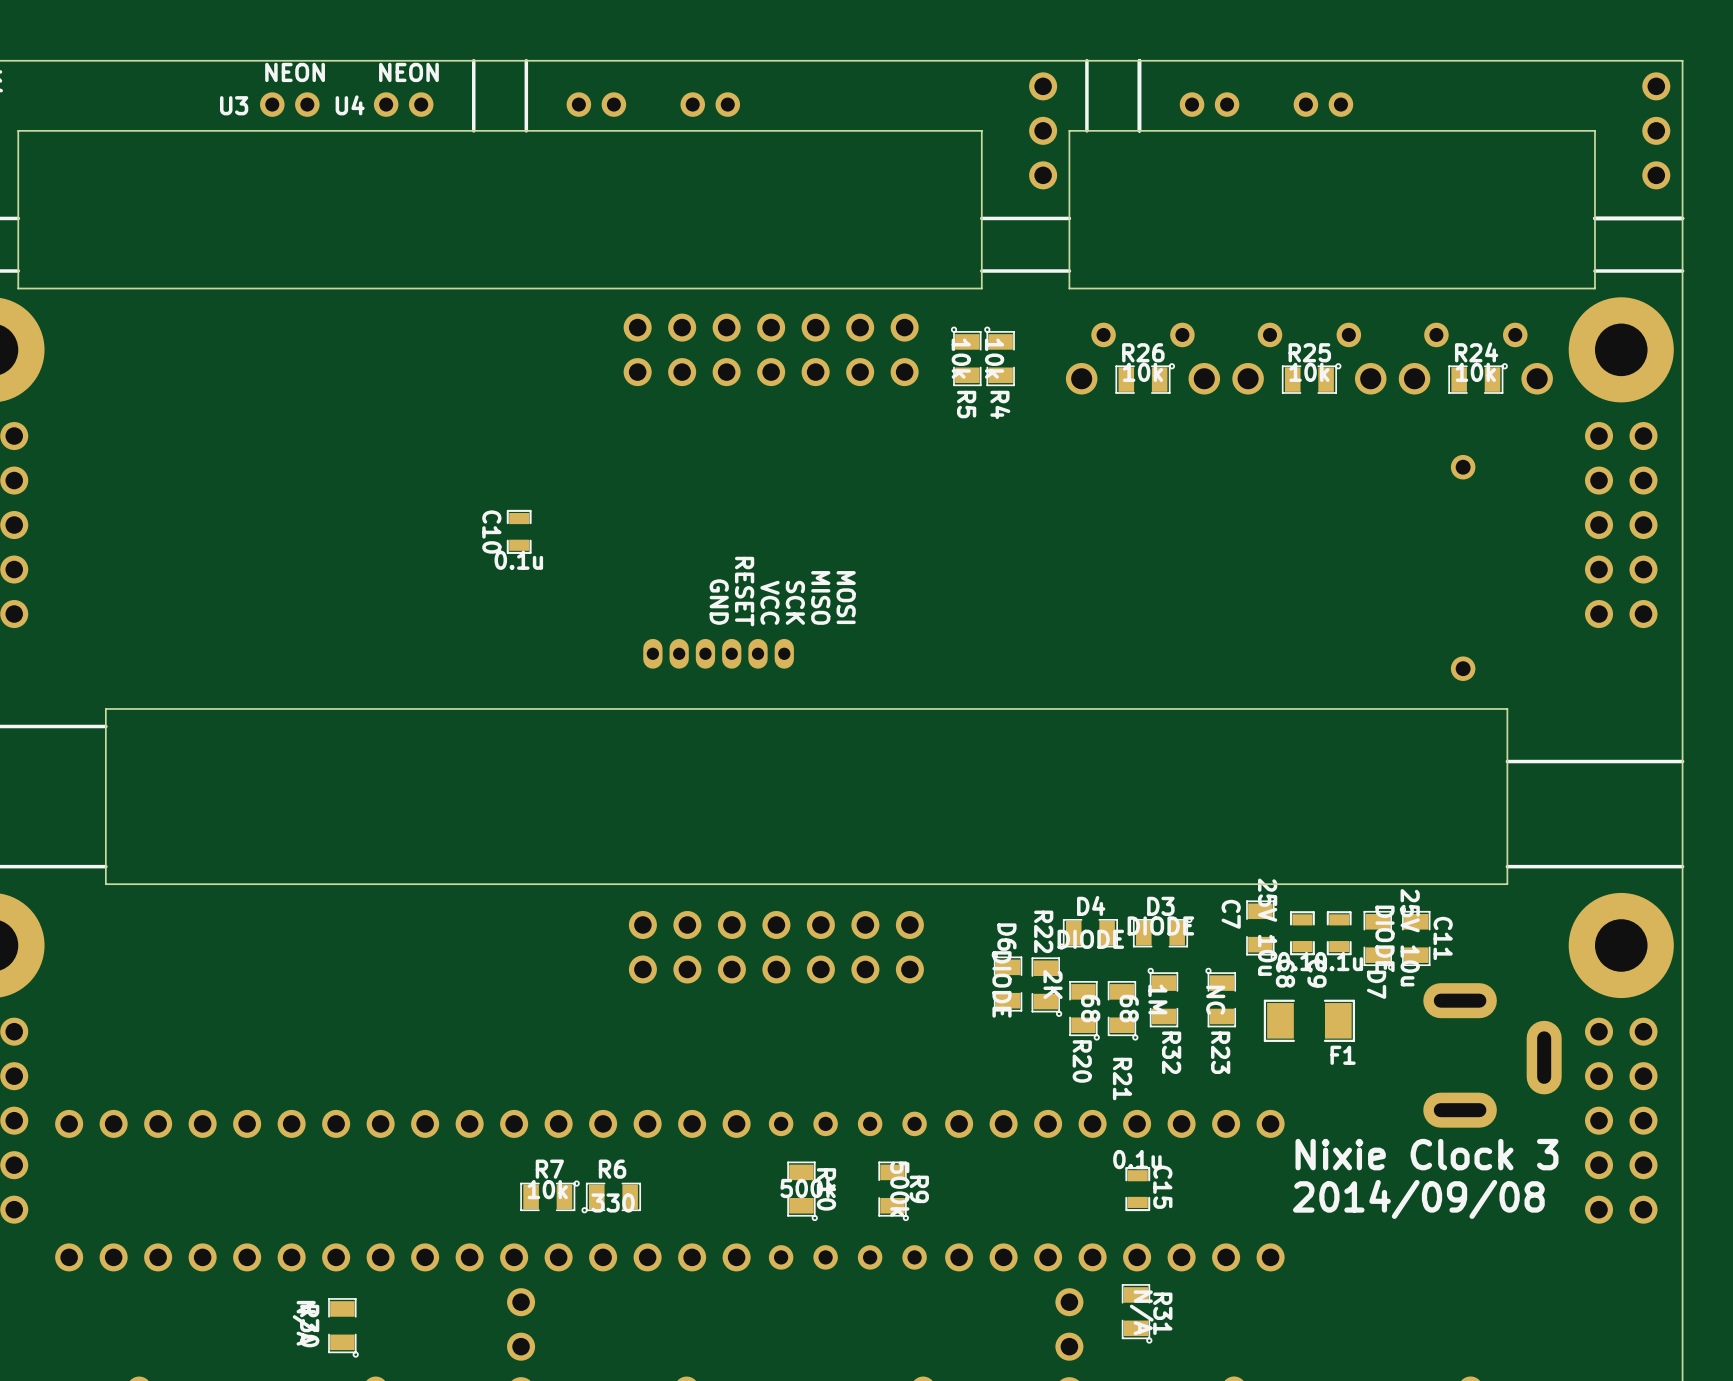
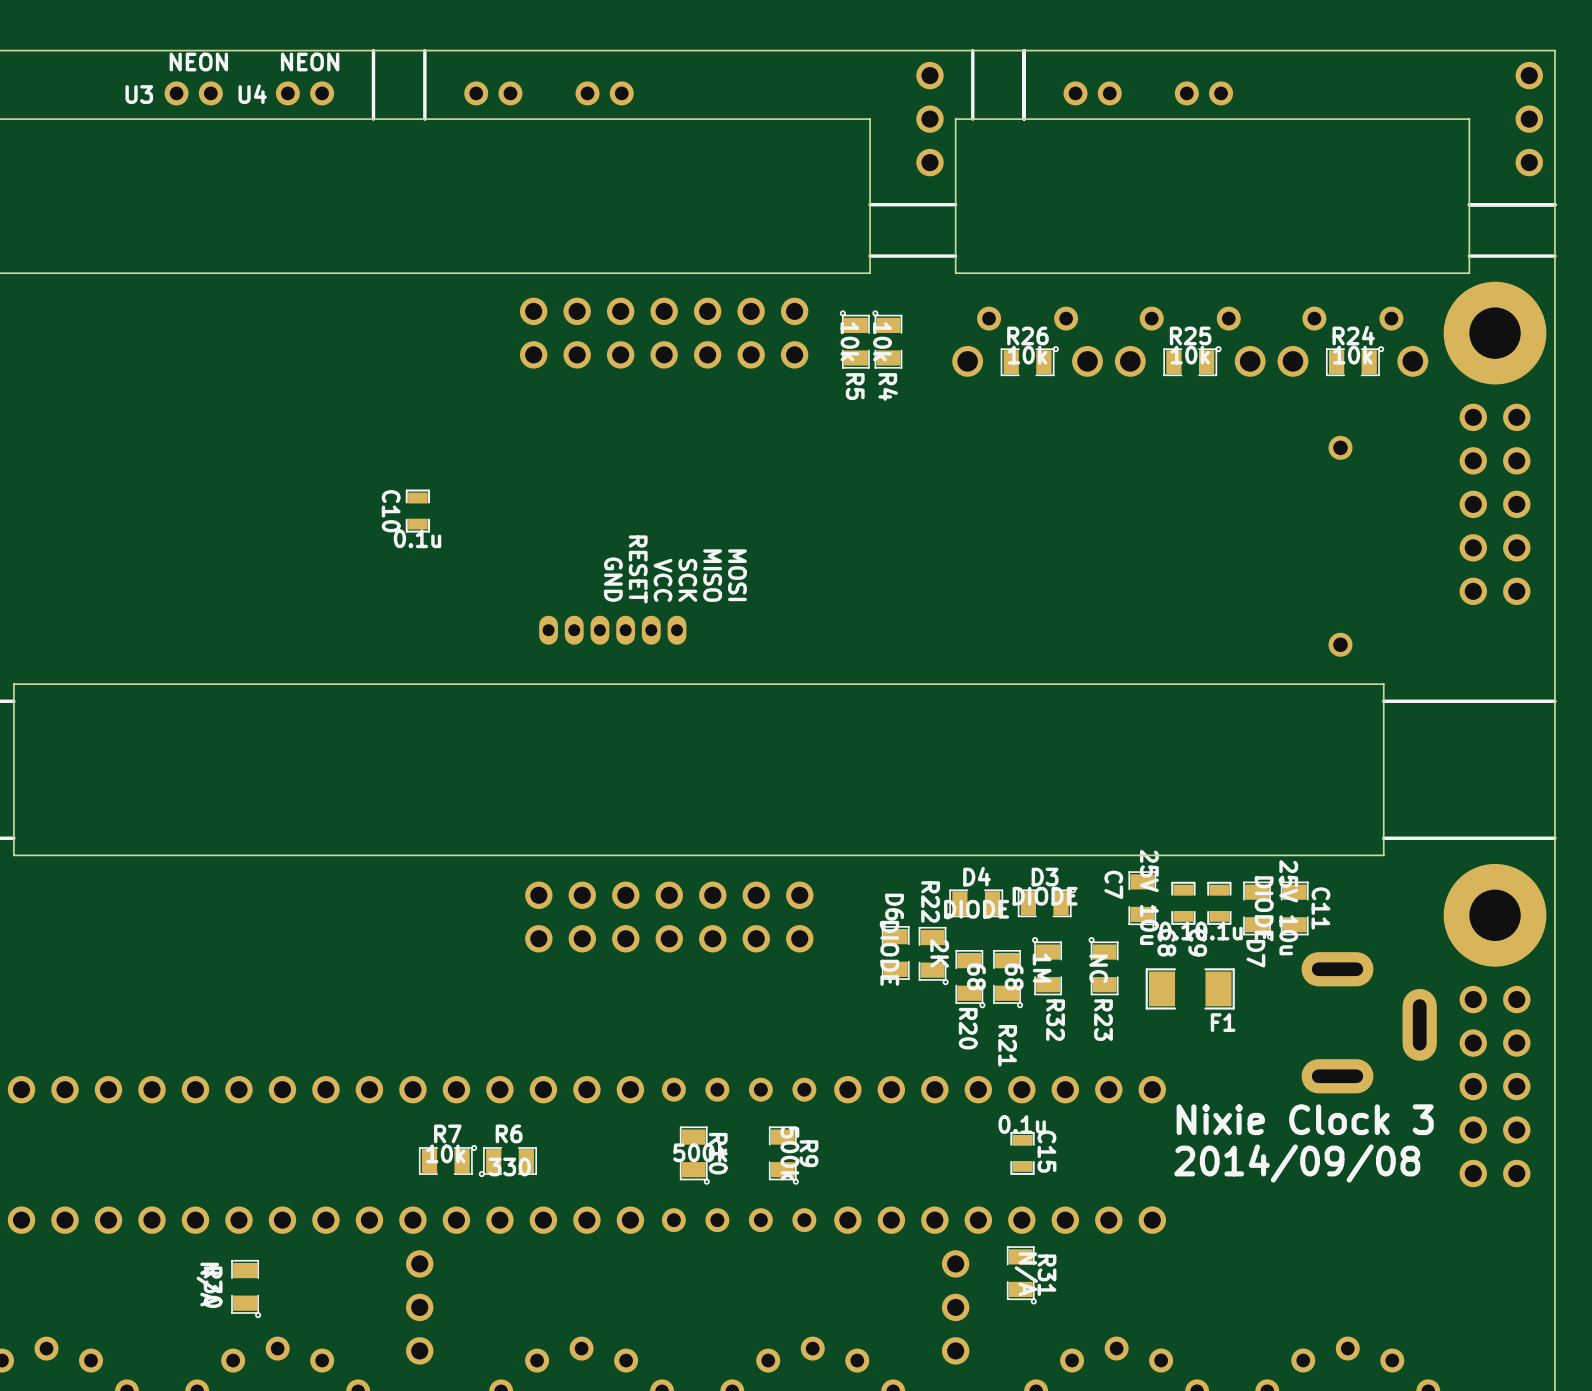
line: (1682, 761) (1507, 761) -> (1554, 701) (1383, 701)

